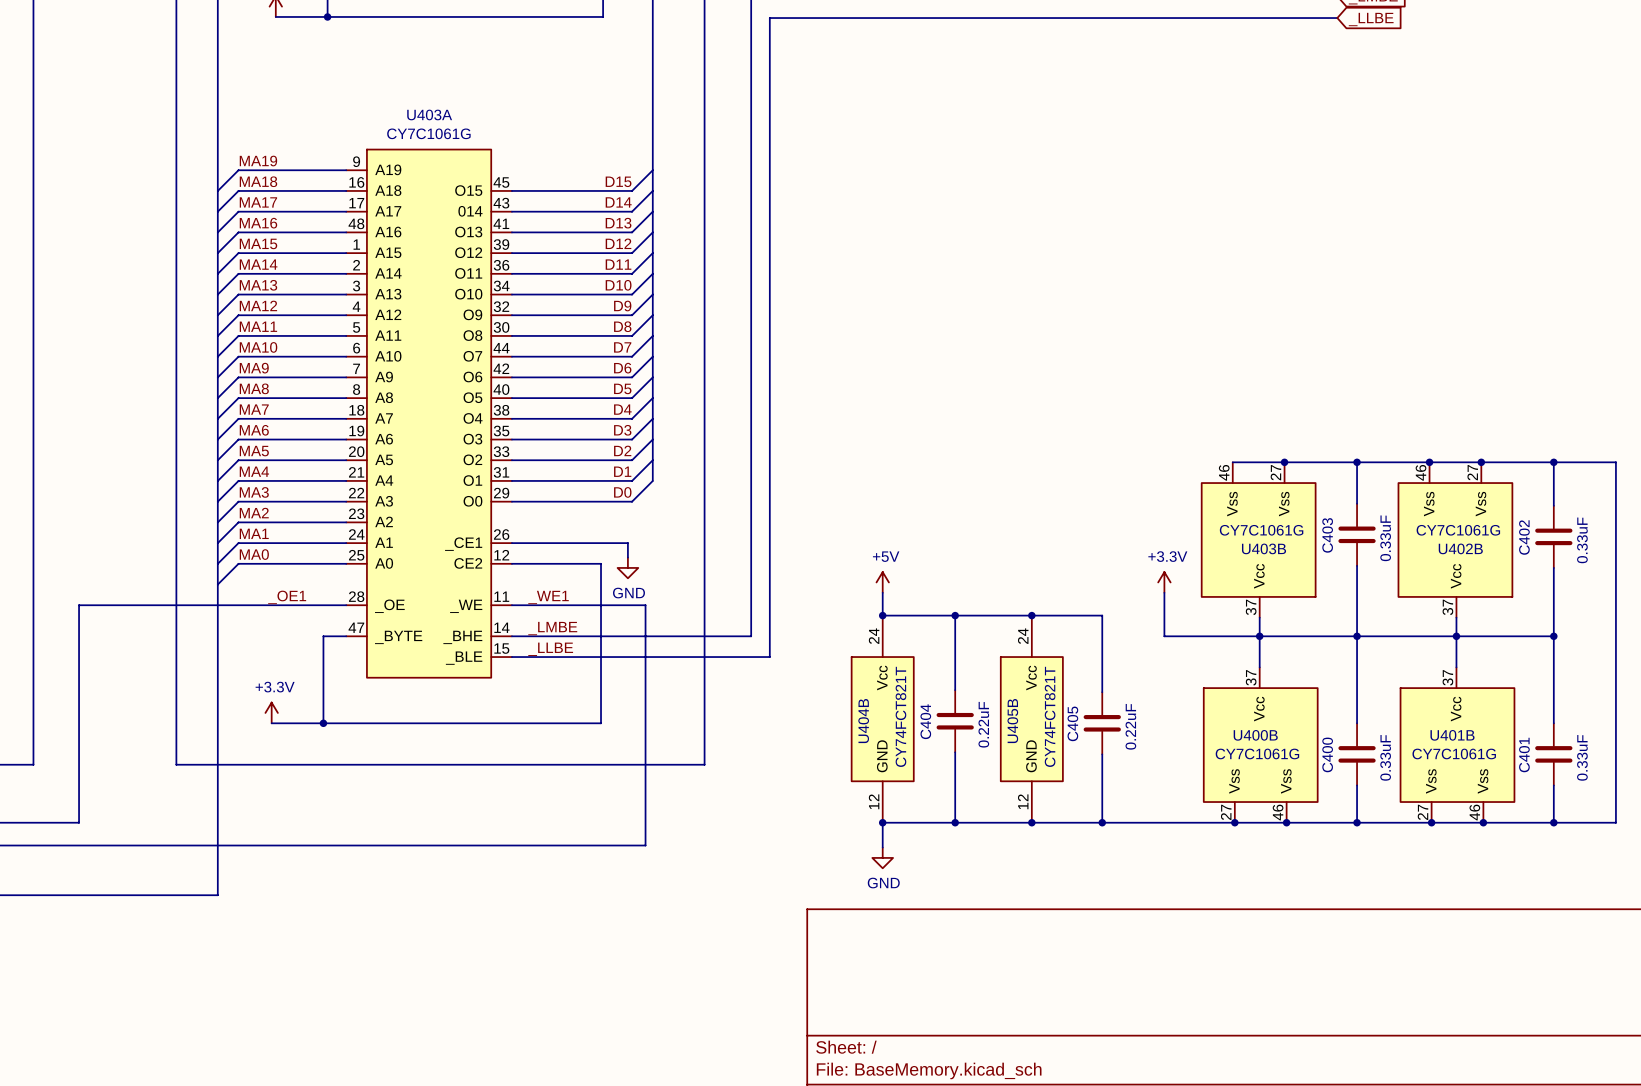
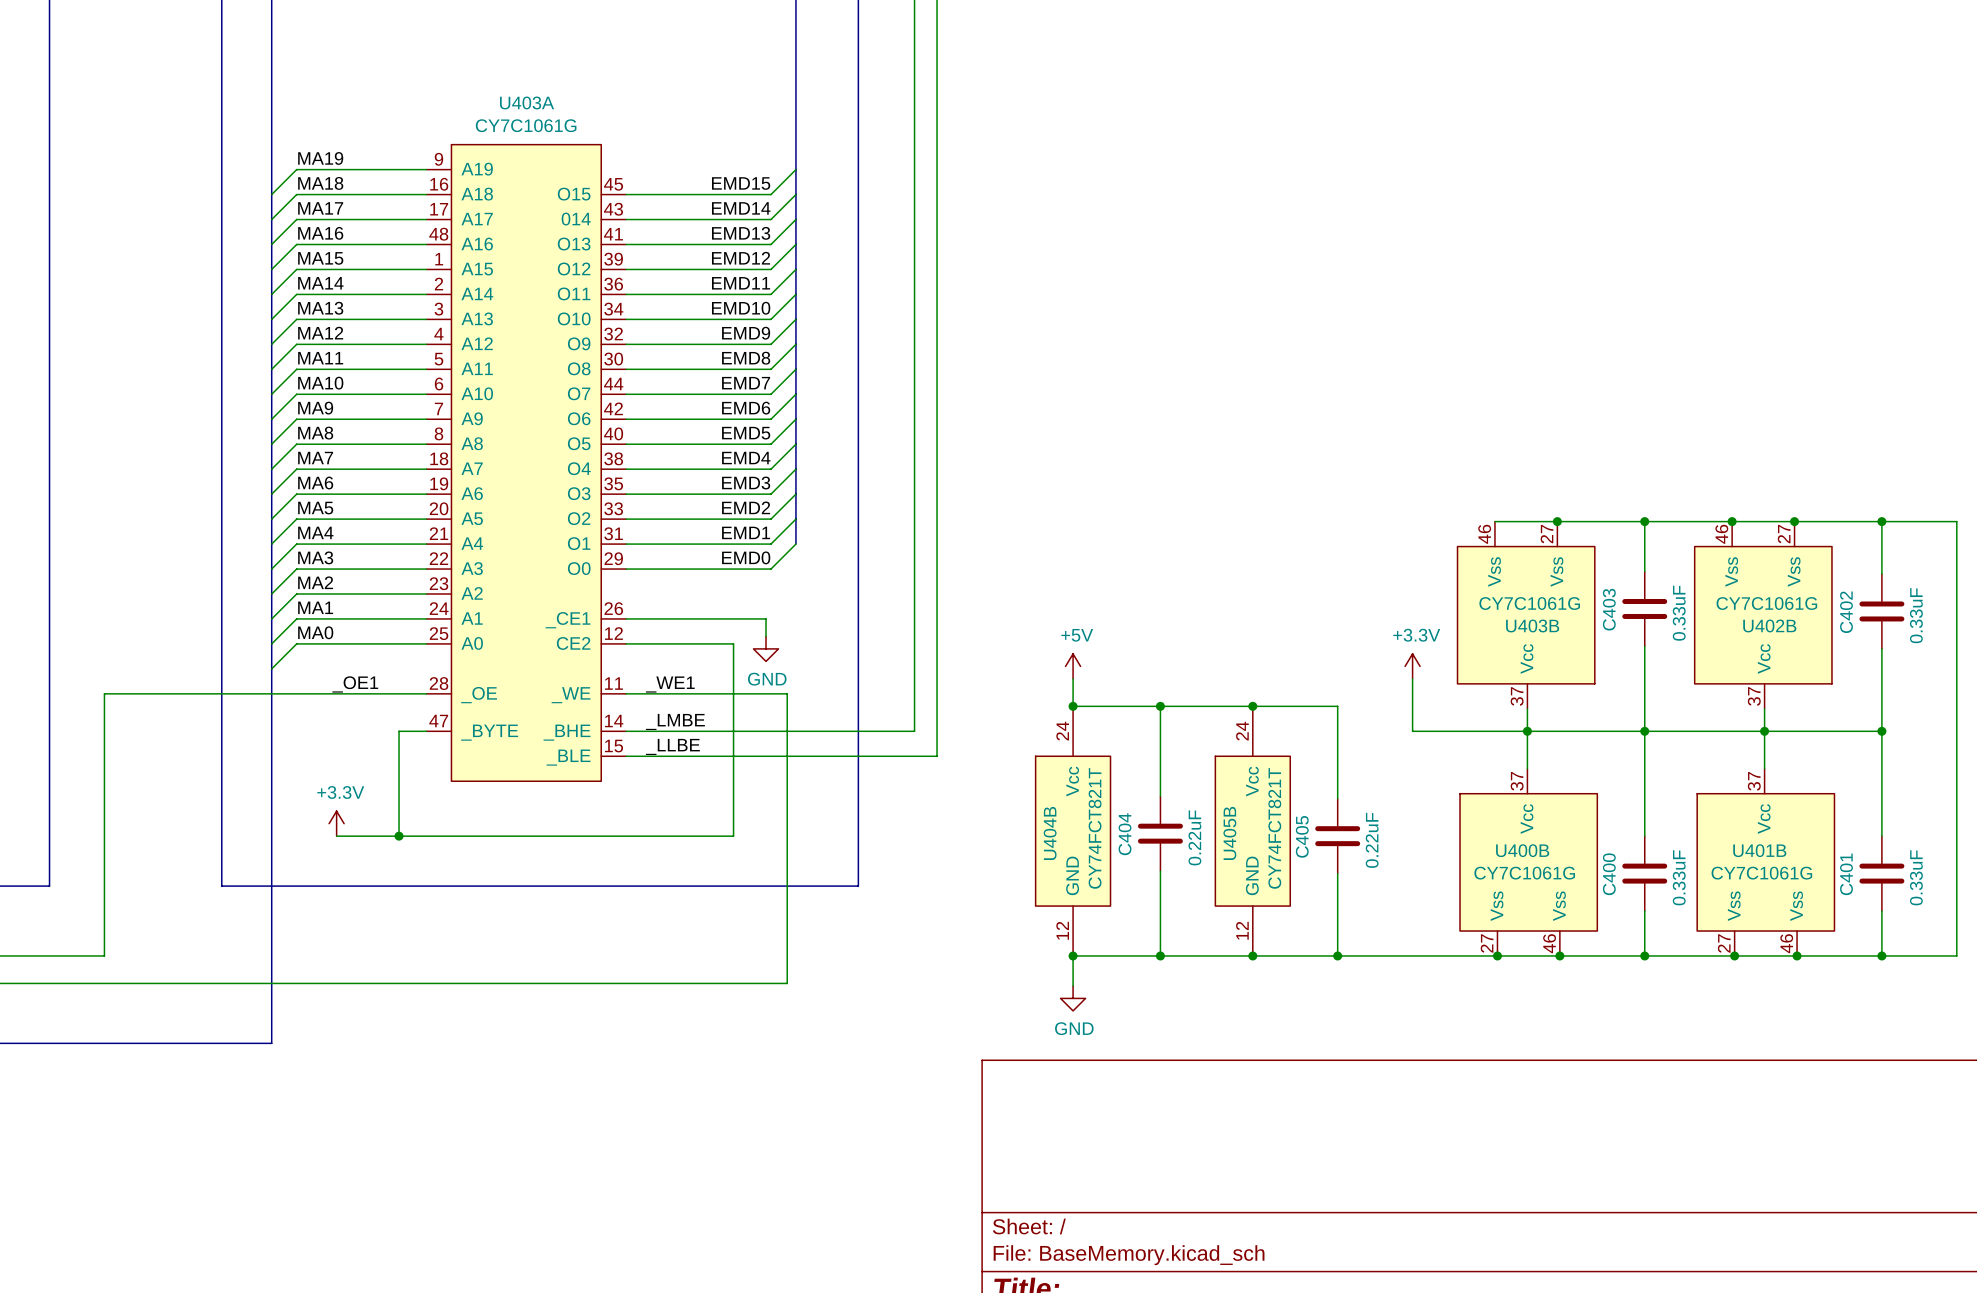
label: D15 (618, 181) -> EMD15 (741, 183)
label: D14 (618, 202) -> EMD14 (741, 208)
label: D13 (618, 223) -> EMD13 (741, 233)
label: D12 (618, 243) -> EMD12 (741, 258)
label: D11 (618, 264) -> EMD11 (741, 283)
label: D10 (618, 285) -> EMD10 (741, 308)
label: D9 (622, 306) -> EMD9 (746, 333)
label: D8 (622, 326) -> EMD8 (746, 358)
label: D7 (622, 347) -> EMD7 (746, 383)
label: D6 (622, 368) -> EMD6 (746, 408)
label: D5 (622, 388) -> EMD5 (746, 433)
label: D4 (622, 409) -> EMD4 (746, 458)
label: D3 (622, 430) -> EMD3 (746, 483)
label: D2 (622, 450) -> EMD2 (746, 507)
label: D1 (622, 471) -> EMD1 (746, 532)
label: D0 (622, 492) -> EMD0 (746, 557)

